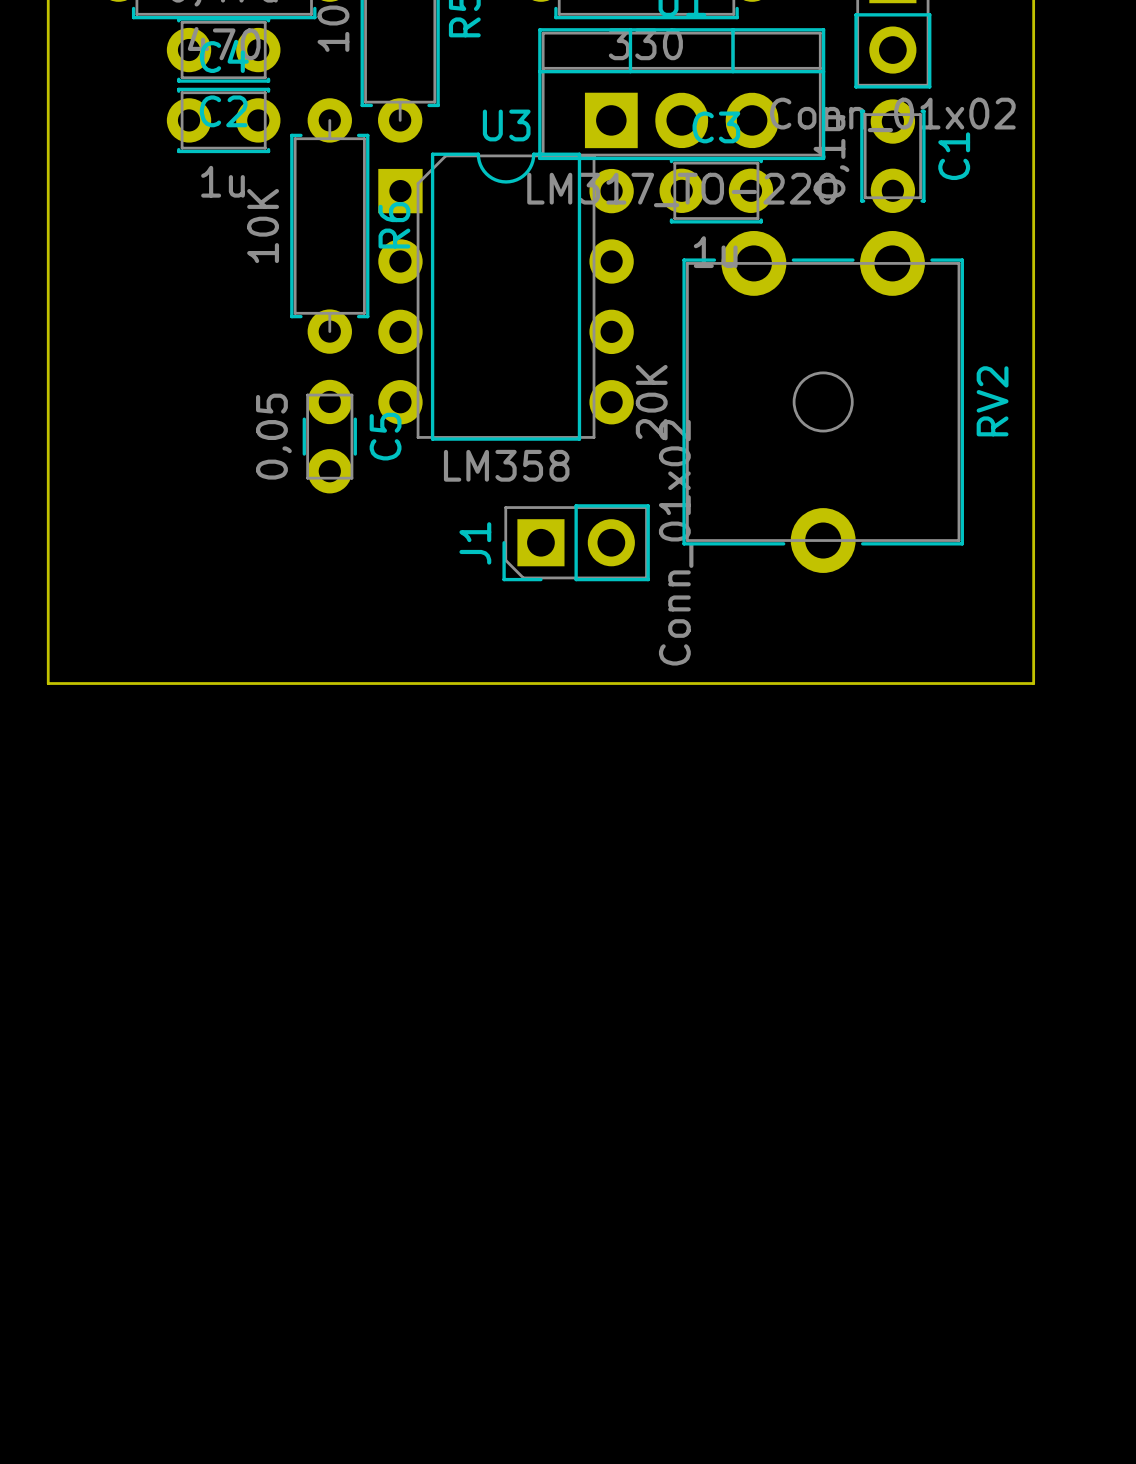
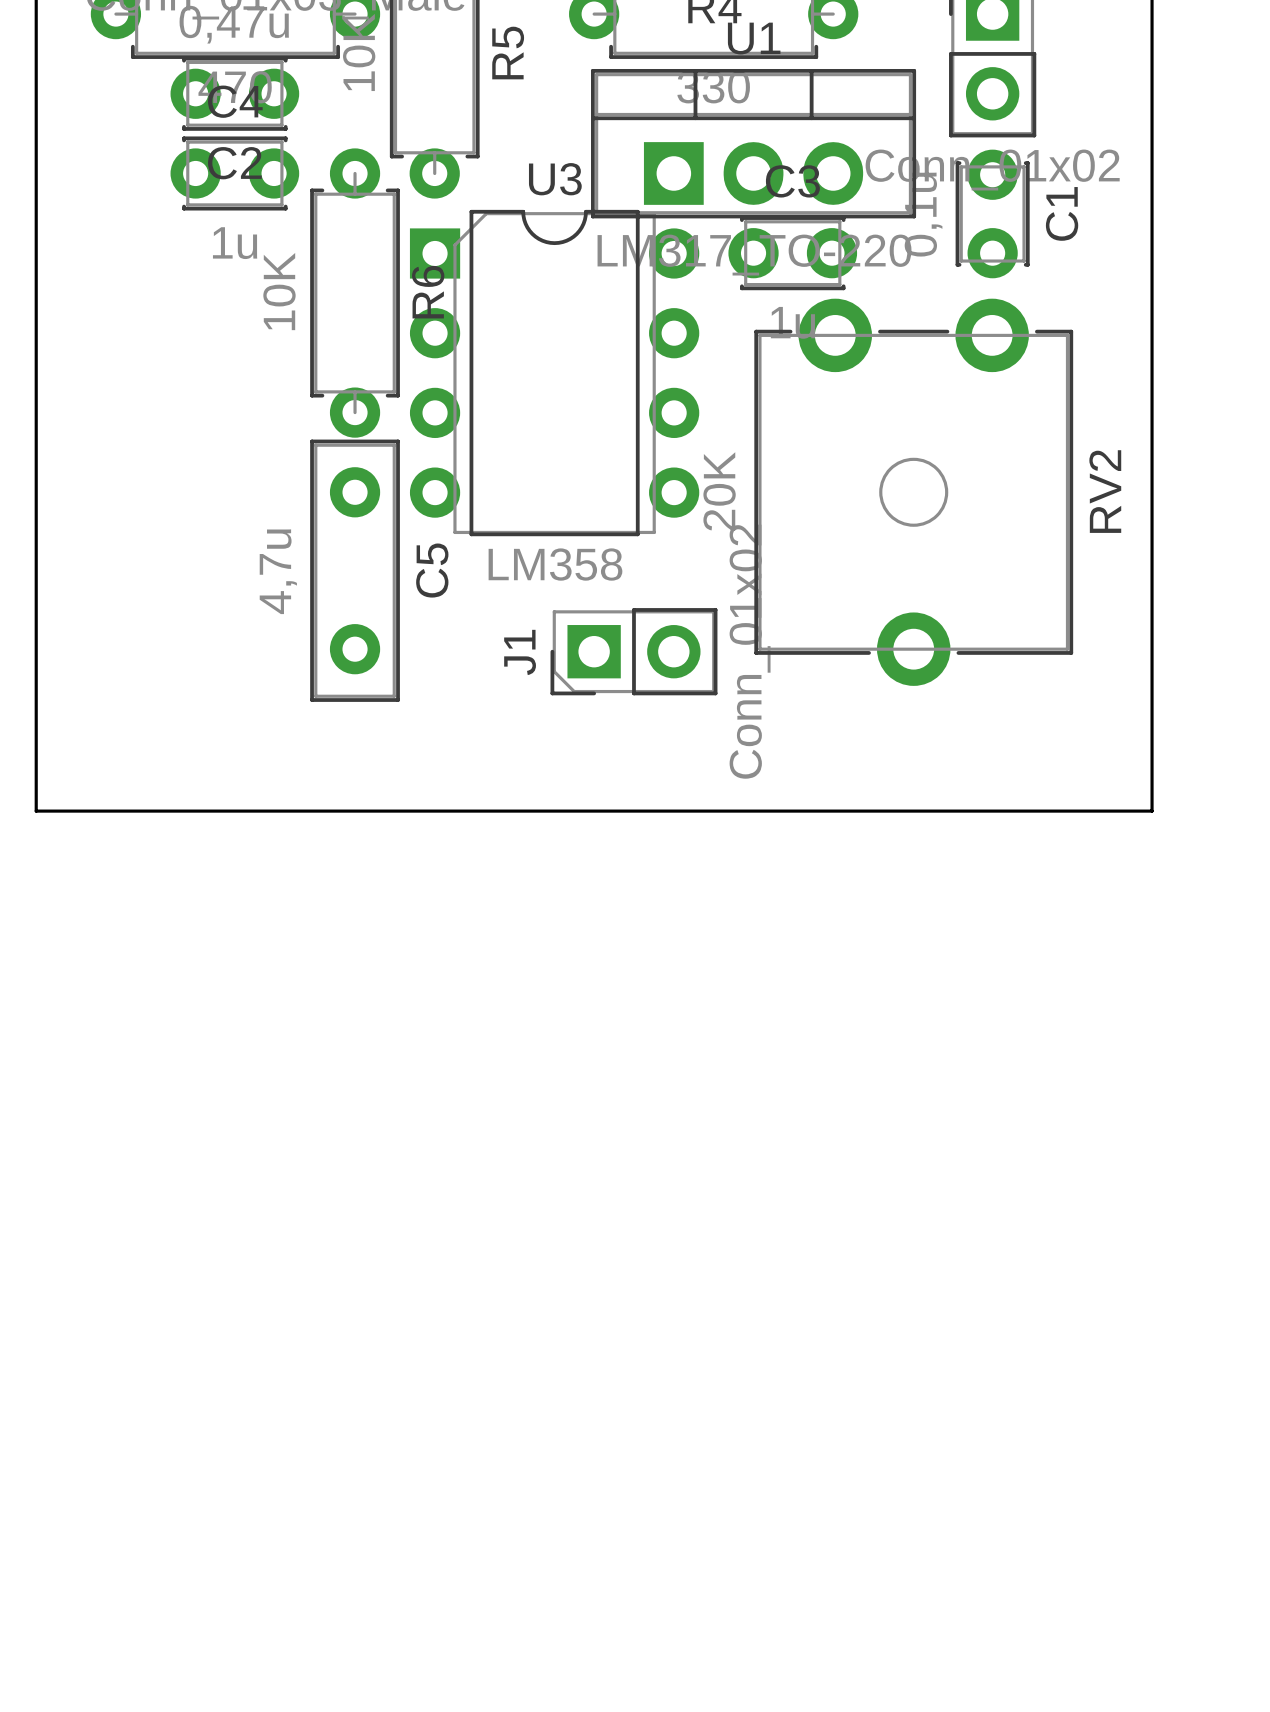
C5 footprint: [302, 379, 357, 494] -> [310, 439, 400, 702]
C5 value: 0,05 (273, 436) -> 4,7u (278, 571)

